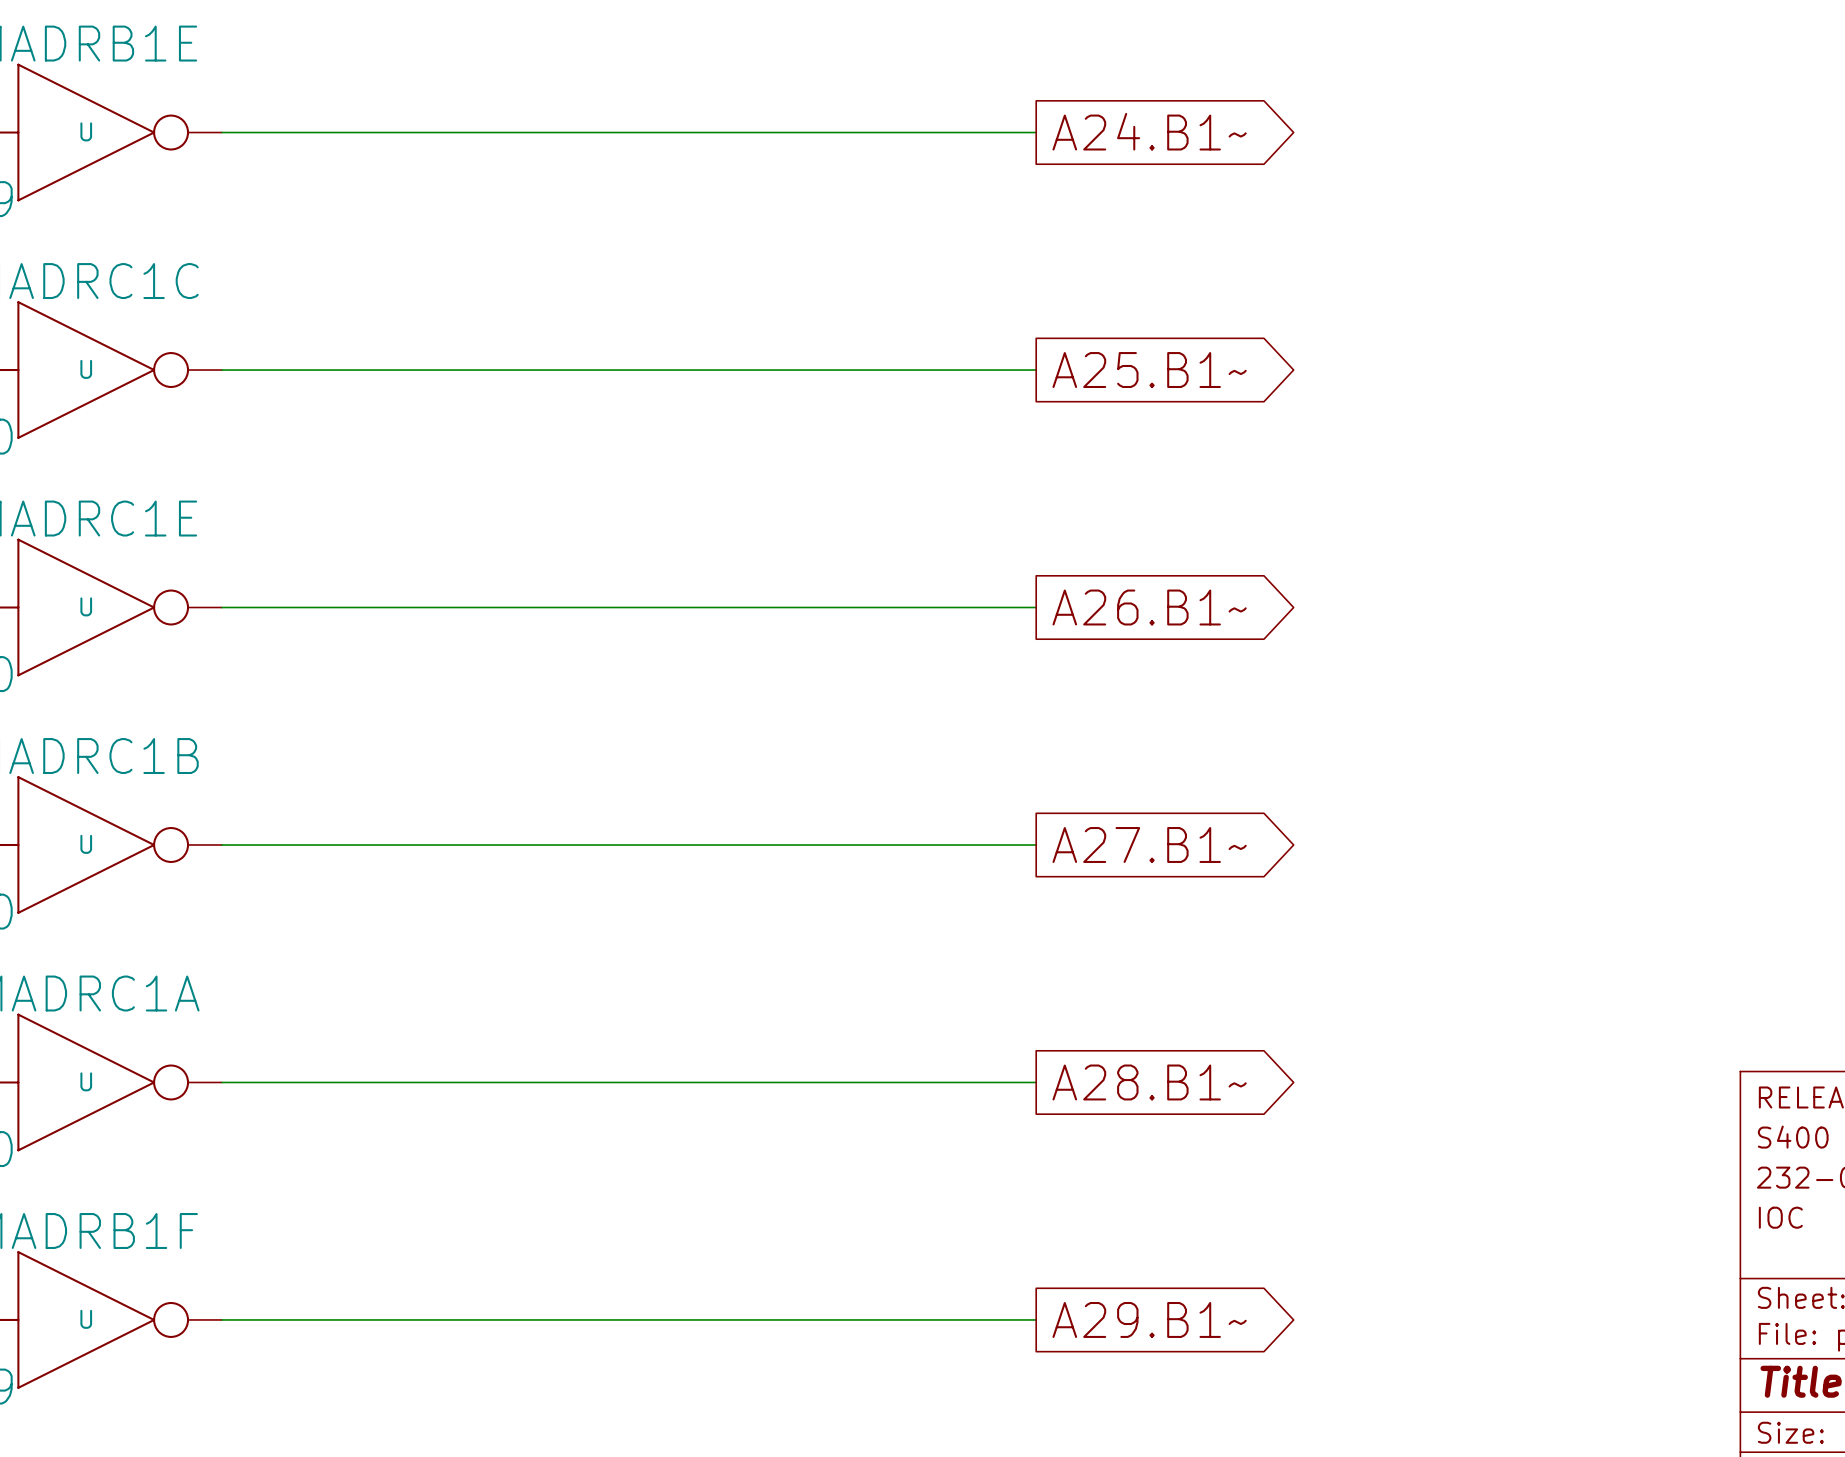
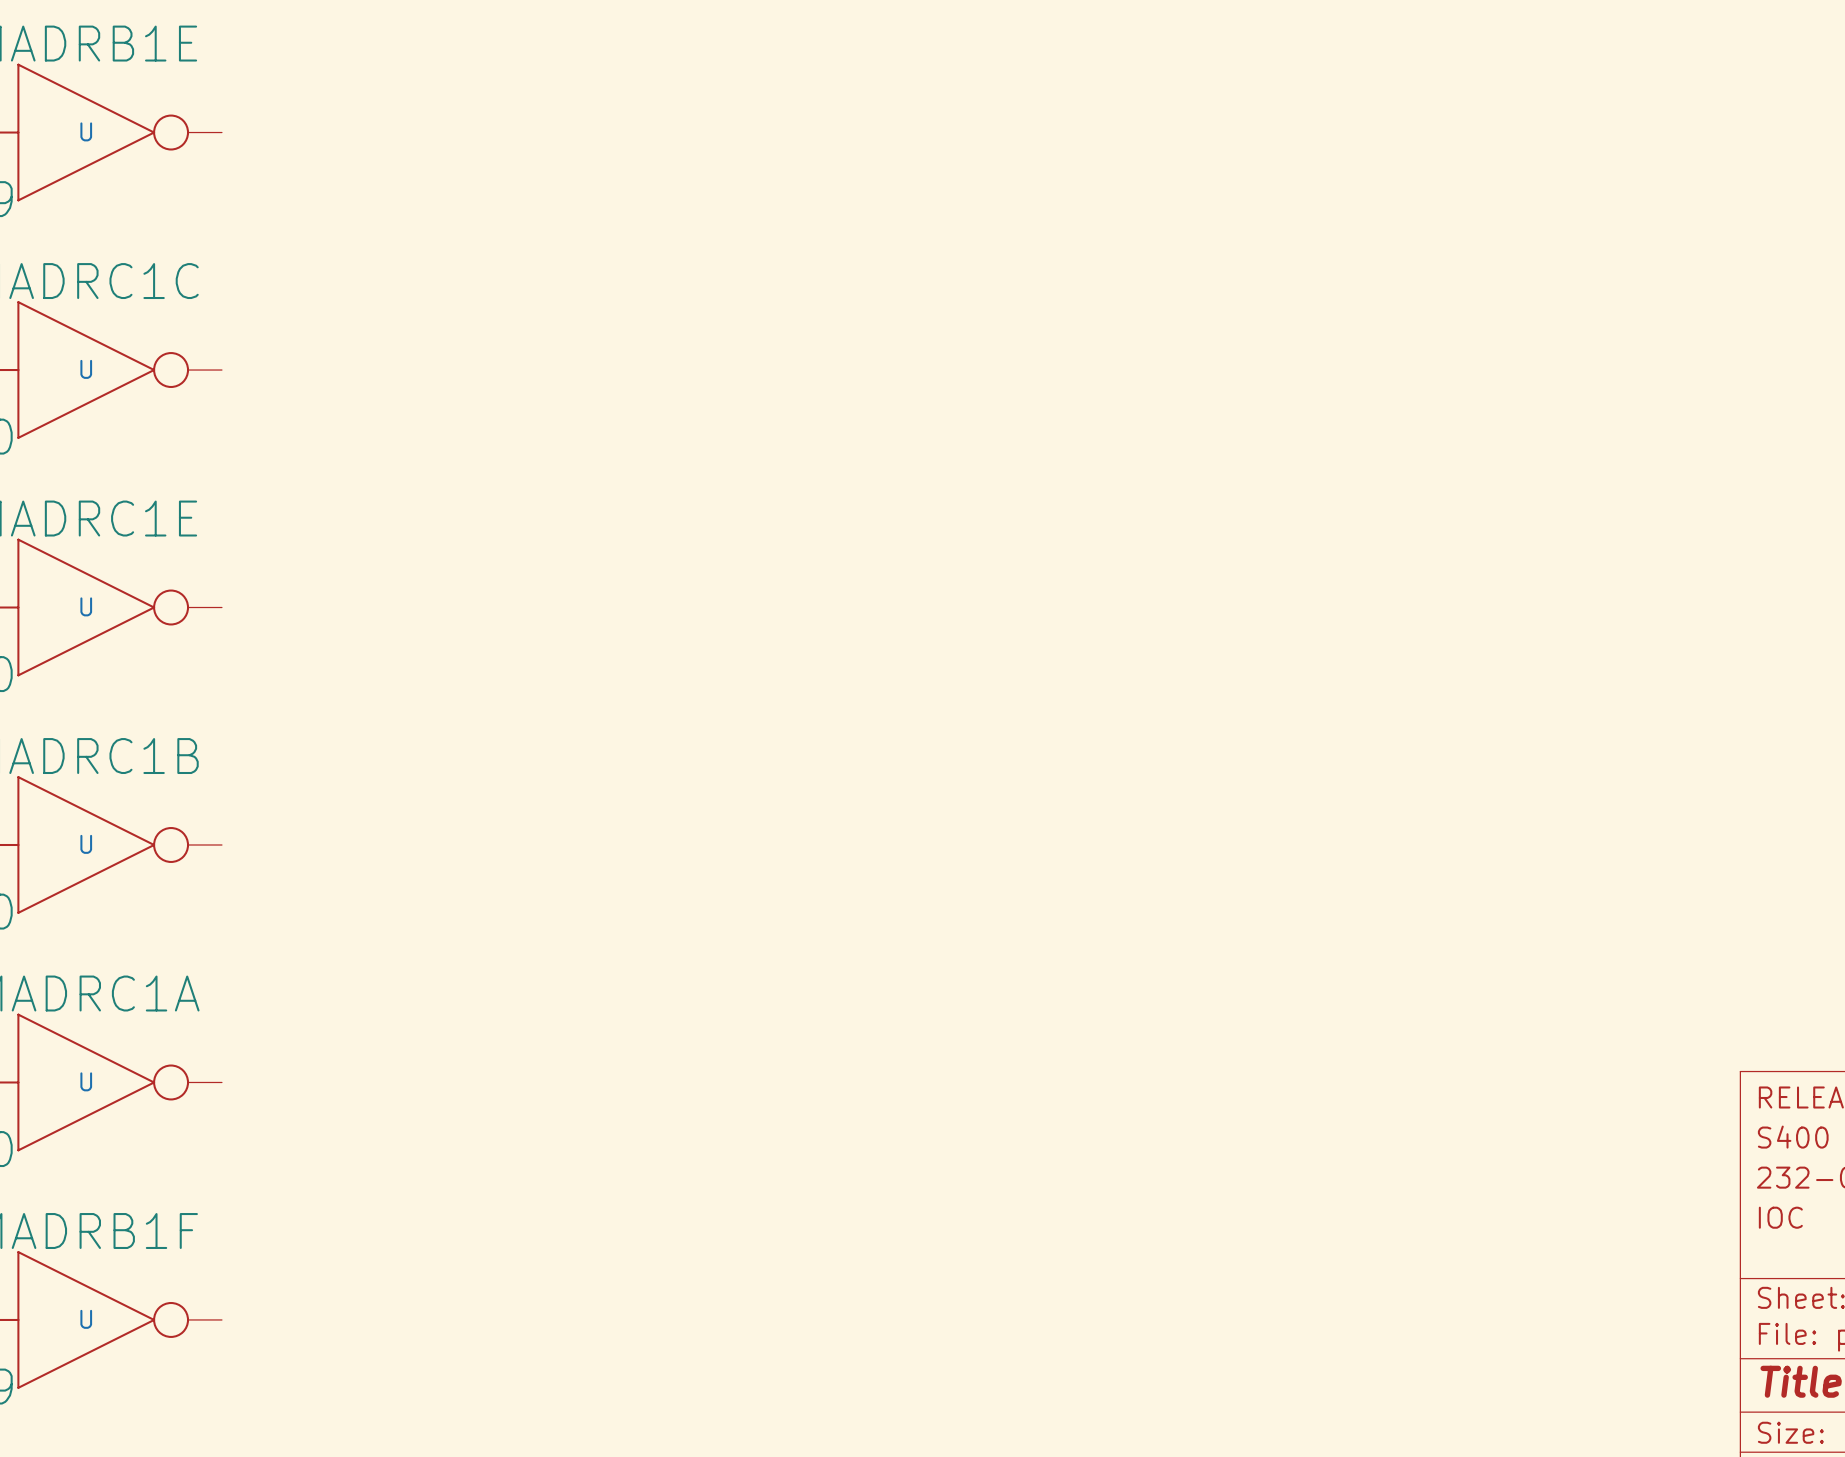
global label: A24.B1~ (1149, 131) -> none
wire: (221, 132) (1036, 132) -> none
wire: (221, 370) (1036, 370) -> none
global label: A25.B1~ (1149, 370) -> none
wire: (221, 607) (1036, 607) -> none
global label: A26.B1~ (1149, 607) -> none
wire: (221, 844) (1036, 844) -> none
global label: A27.B1~ (1149, 844) -> none
wire: (221, 1082) (1036, 1082) -> none
global label: A28.B1~ (1149, 1082) -> none
wire: (221, 1319) (1036, 1319) -> none
global label: A29.B1~ (1149, 1319) -> none

